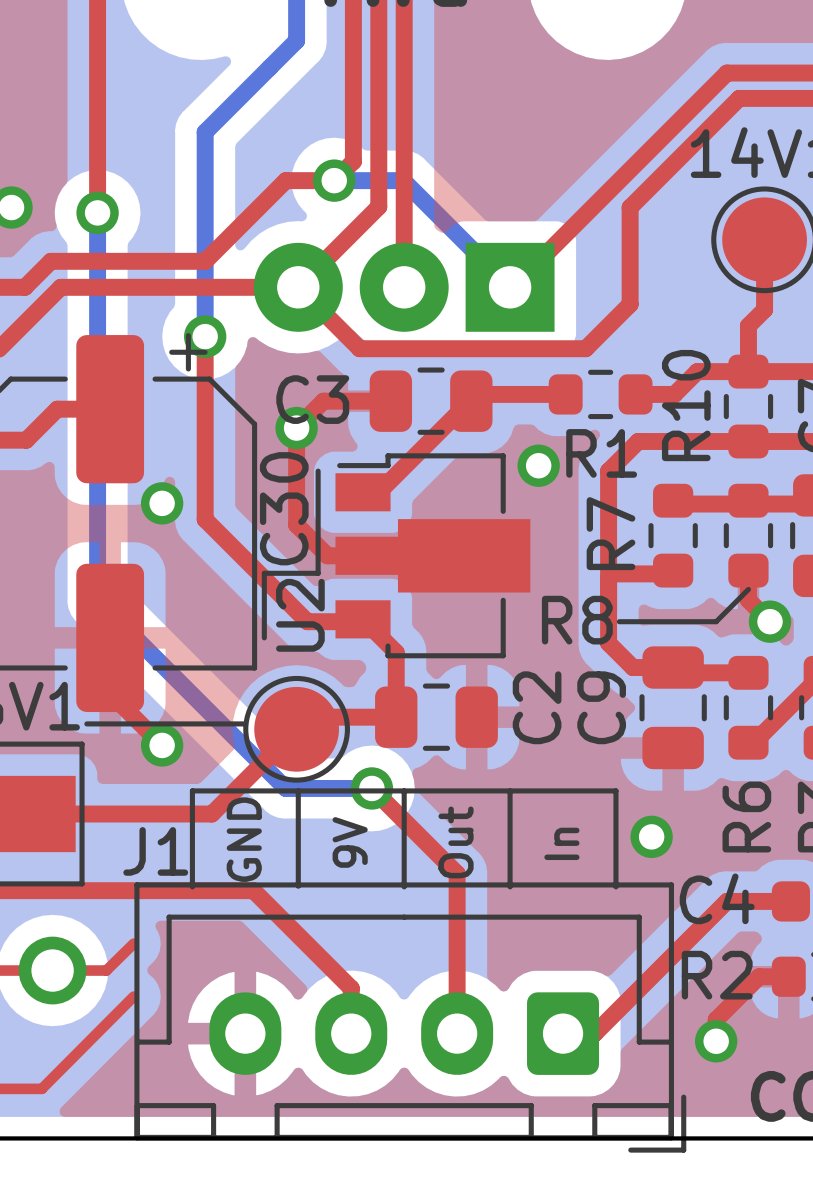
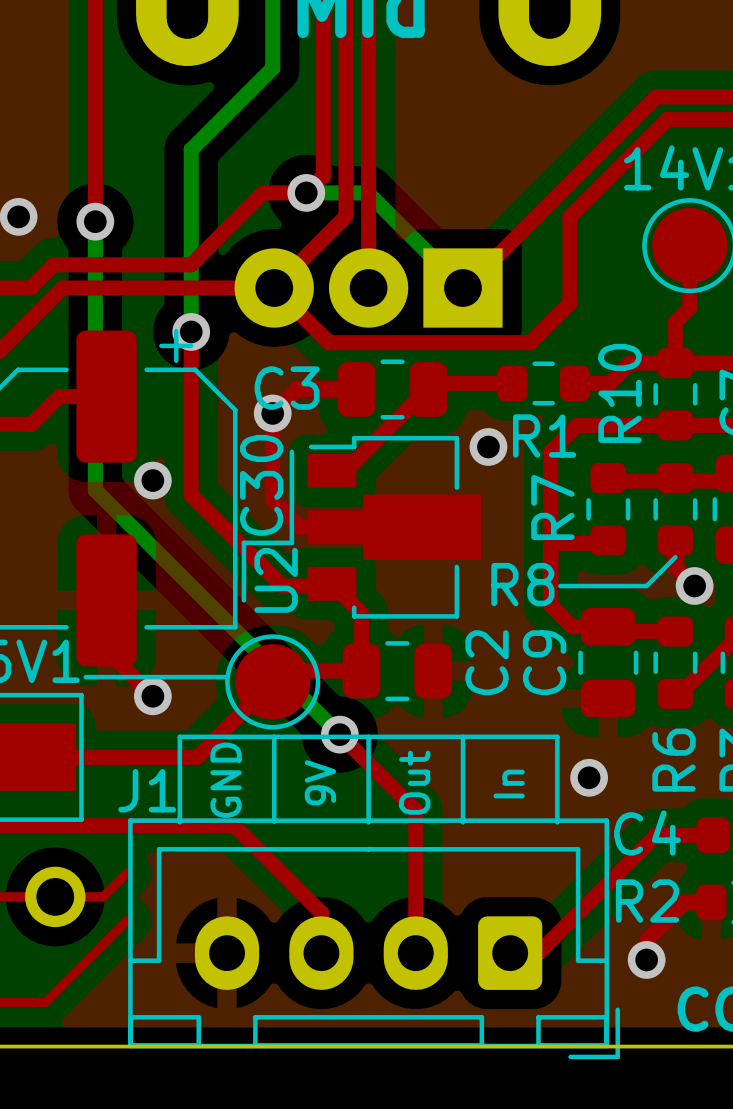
bottom track: (97, 514) (97, 600) (285, 788) (371, 788) -> (95, 490) (339, 734)

